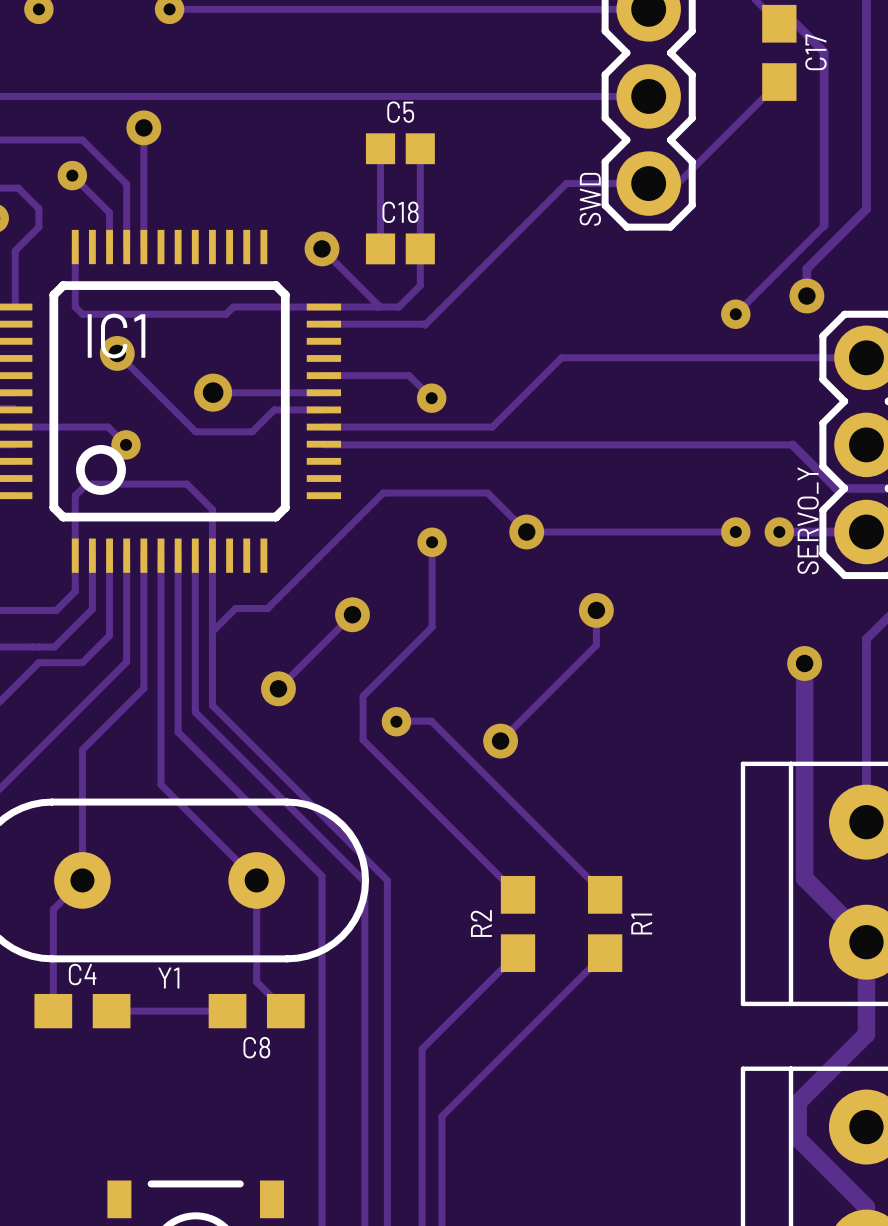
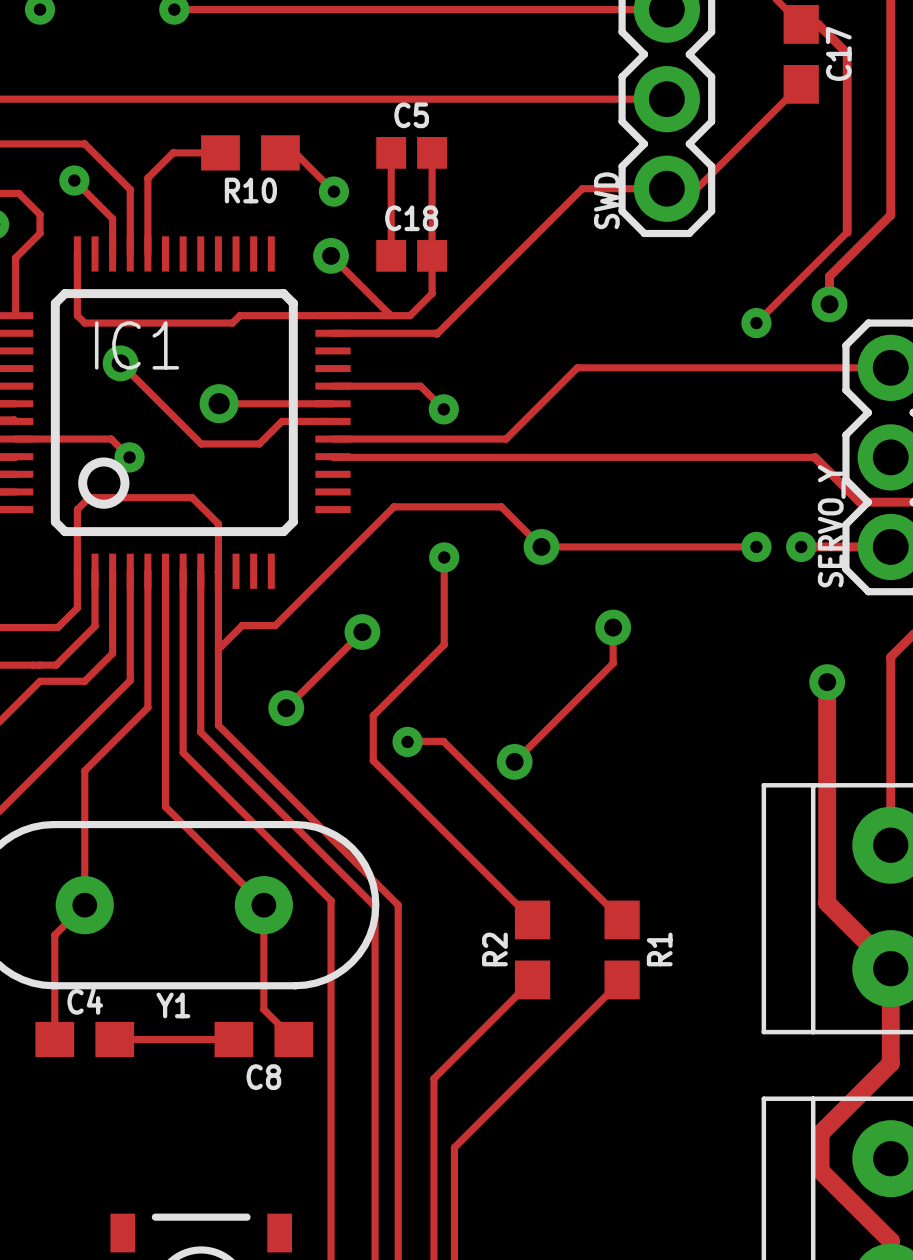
track: (143, 127) (143, 173) -> (220, 152) (173, 152) (147, 178)
via: (143, 127) -> none
R10: none -> (250, 152)
track: none -> (280, 152) (295, 152) (333, 191)
via: none -> (333, 191)

